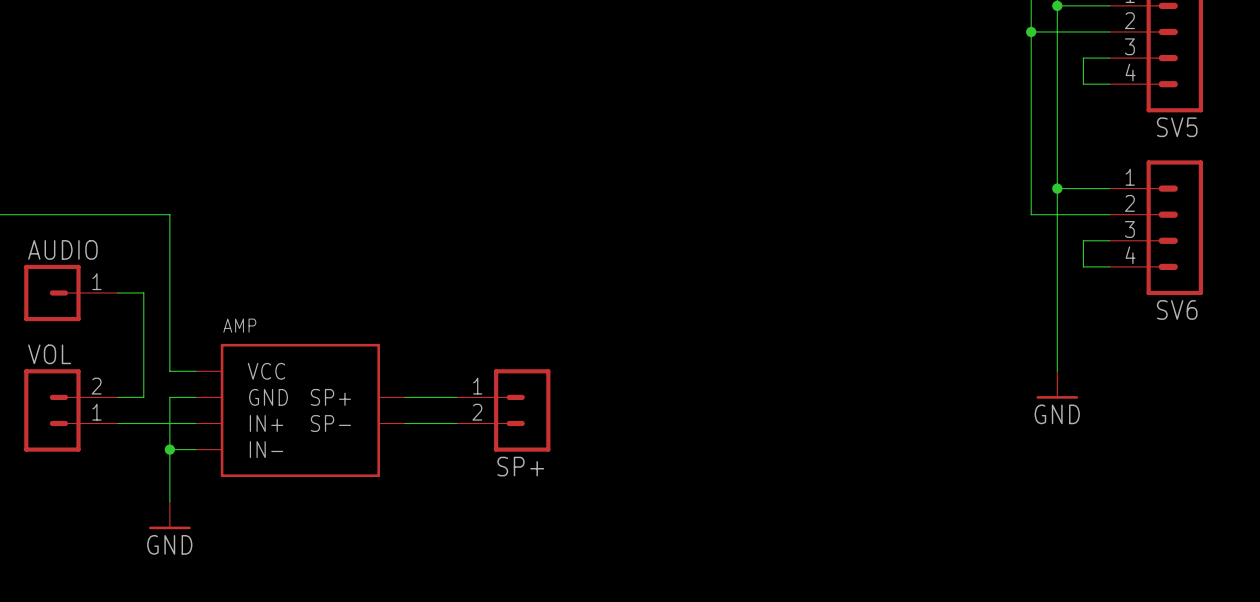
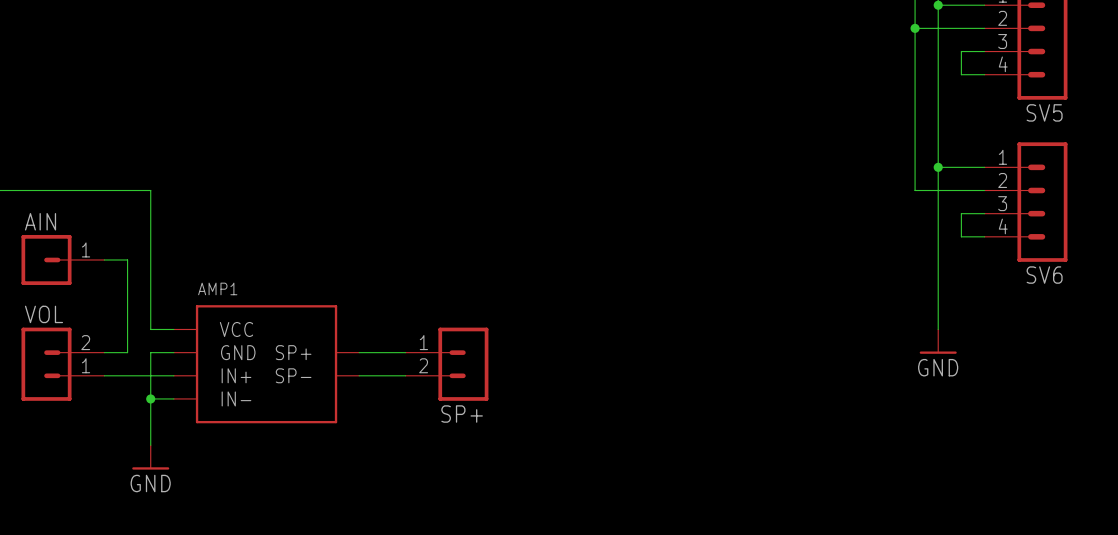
AUDIO name: AUDIO (62, 249) -> AIN (40, 221)
AMP name: AMP (239, 325) -> AMP1 (217, 288)

